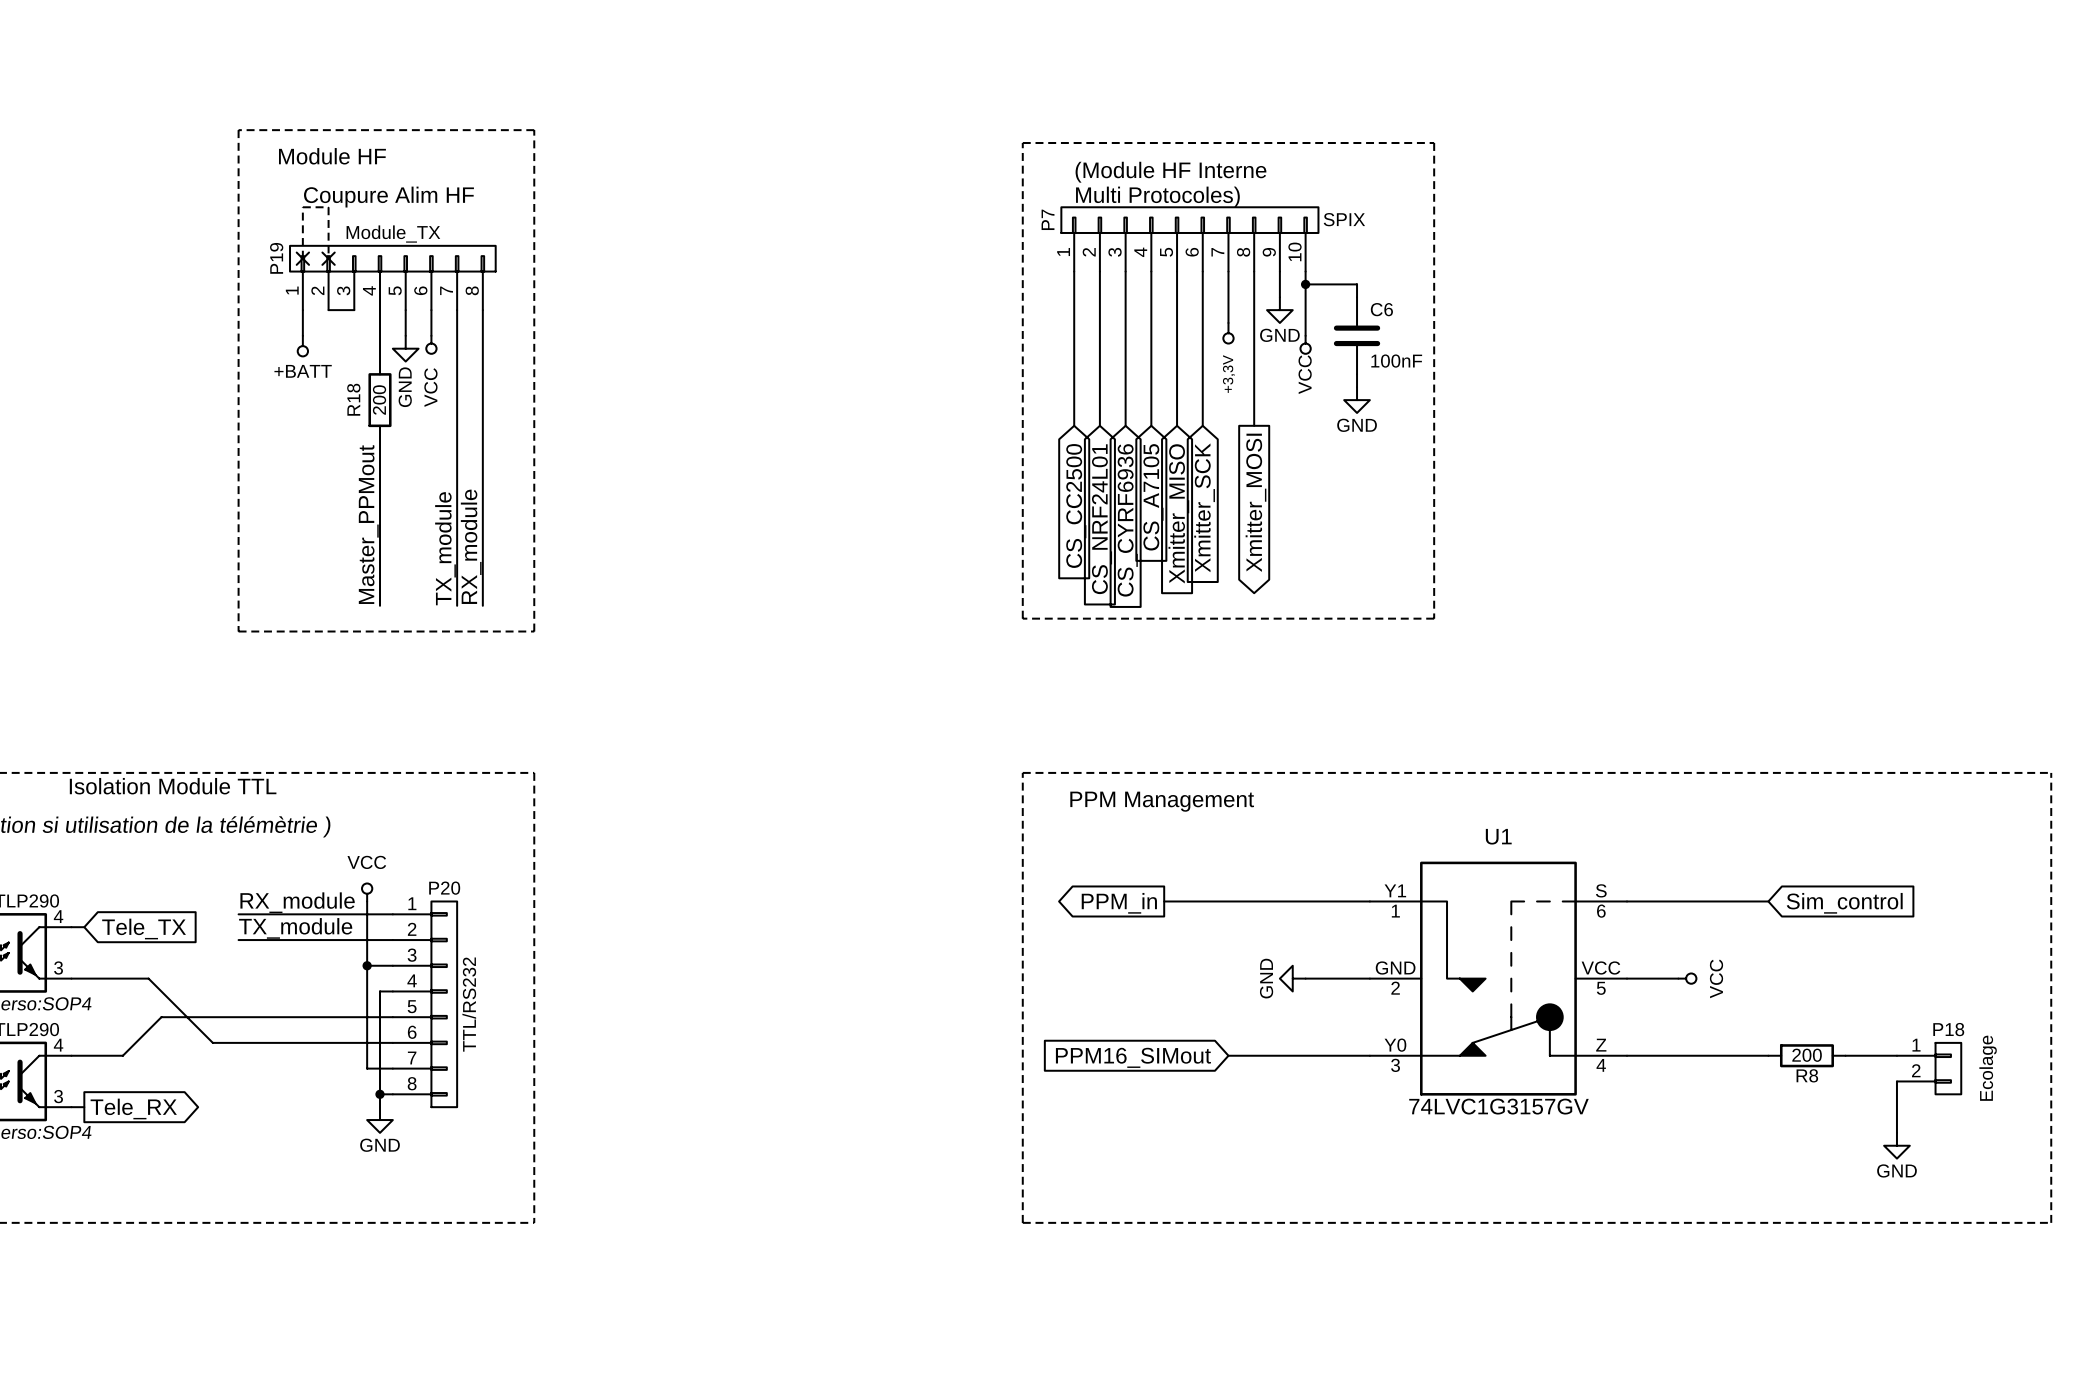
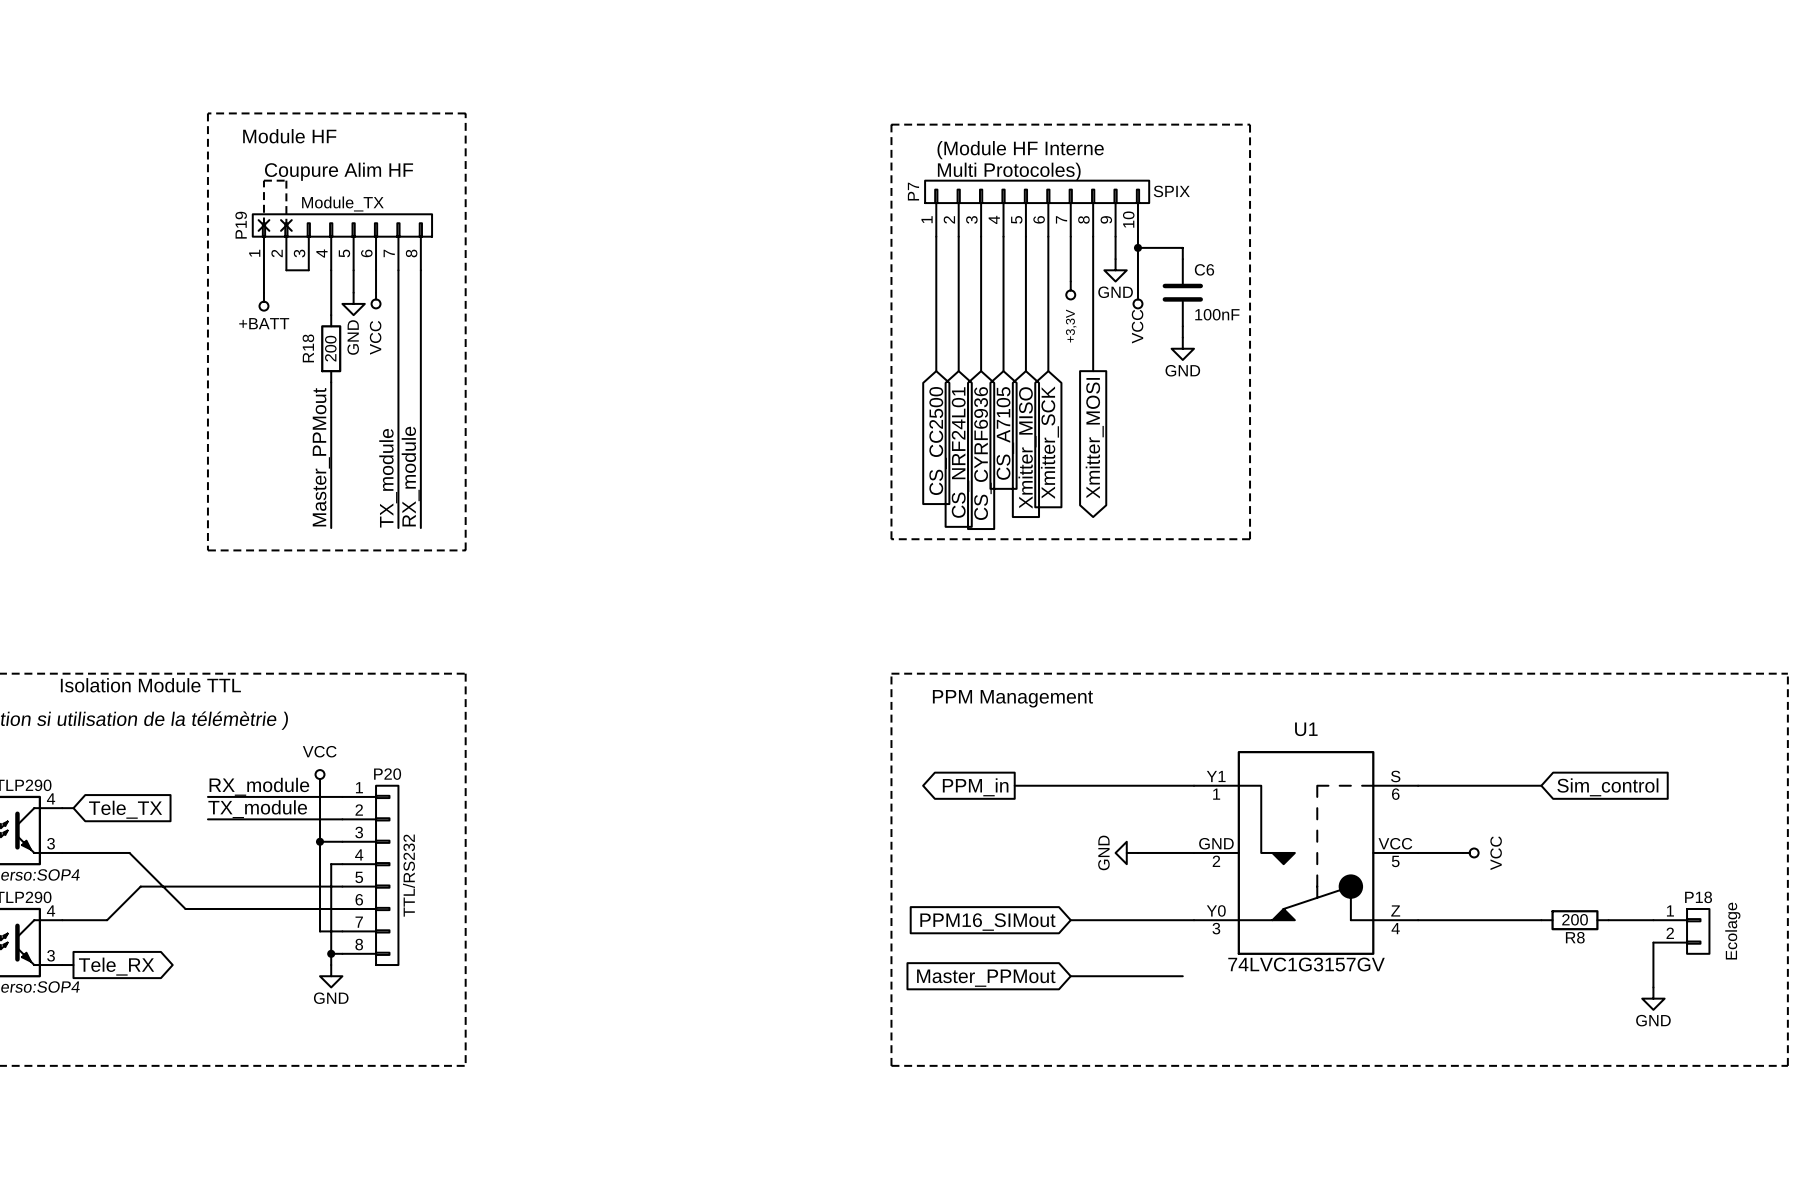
wire: none -> (1070, 976) (1182, 976)
global label: none -> Master_PPMout (986, 978)

